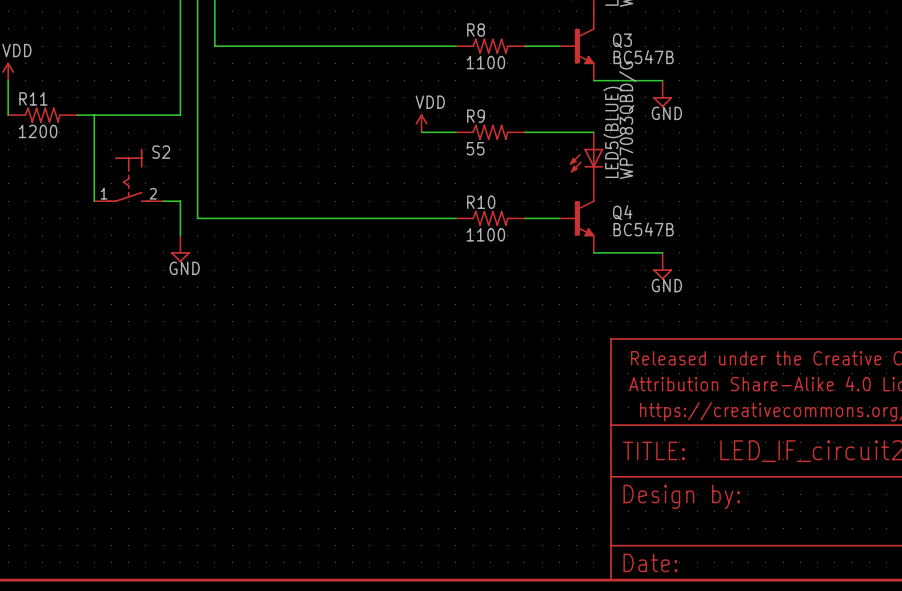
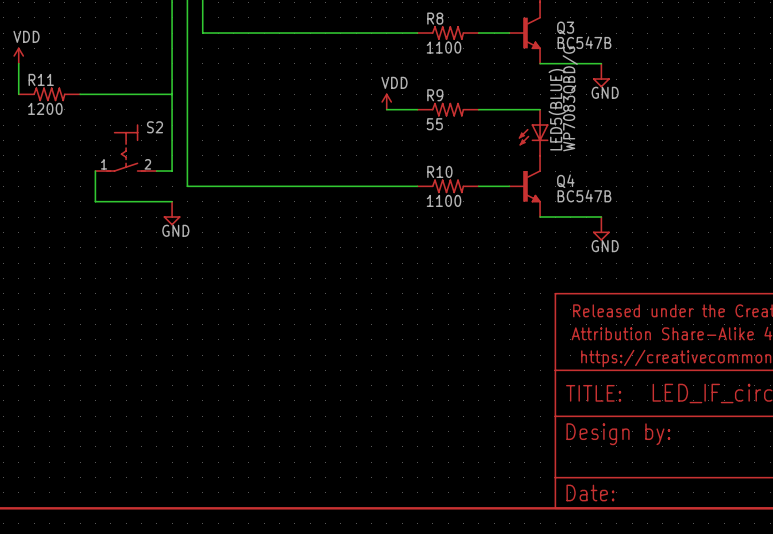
wire: (94, 115) (94, 201) -> (172, 94) (172, 171)
wire: (180, 201) (180, 235) -> (95, 171) (95, 201) (172, 201)

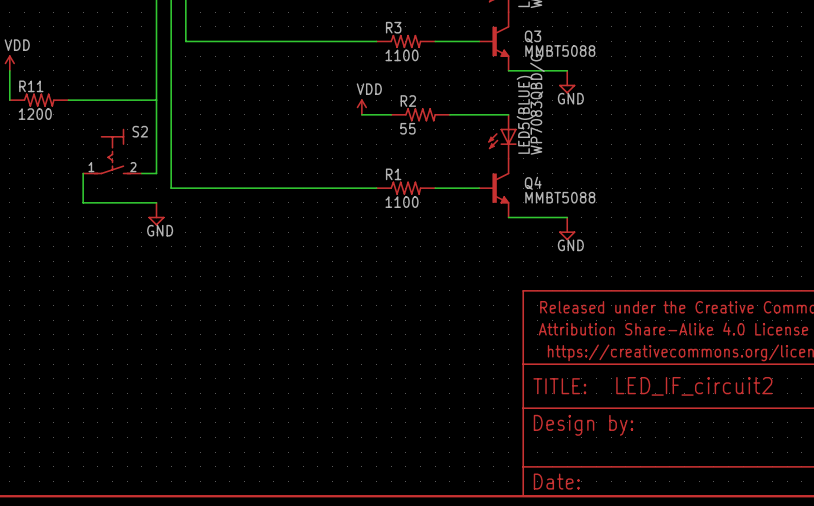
R3: none -> 1100 (405, 41)
R8: 1100 (448, 33) -> none
Q3 value: BC547B (584, 42) -> MMBT5088 (560, 51)
R9 name: R9 (435, 95) -> R2 (408, 101)
R1: none -> 1100 (405, 188)
R10: 1100 (448, 186) -> none
Q4 value: BC547B (584, 196) -> MMBT5088 (560, 197)

